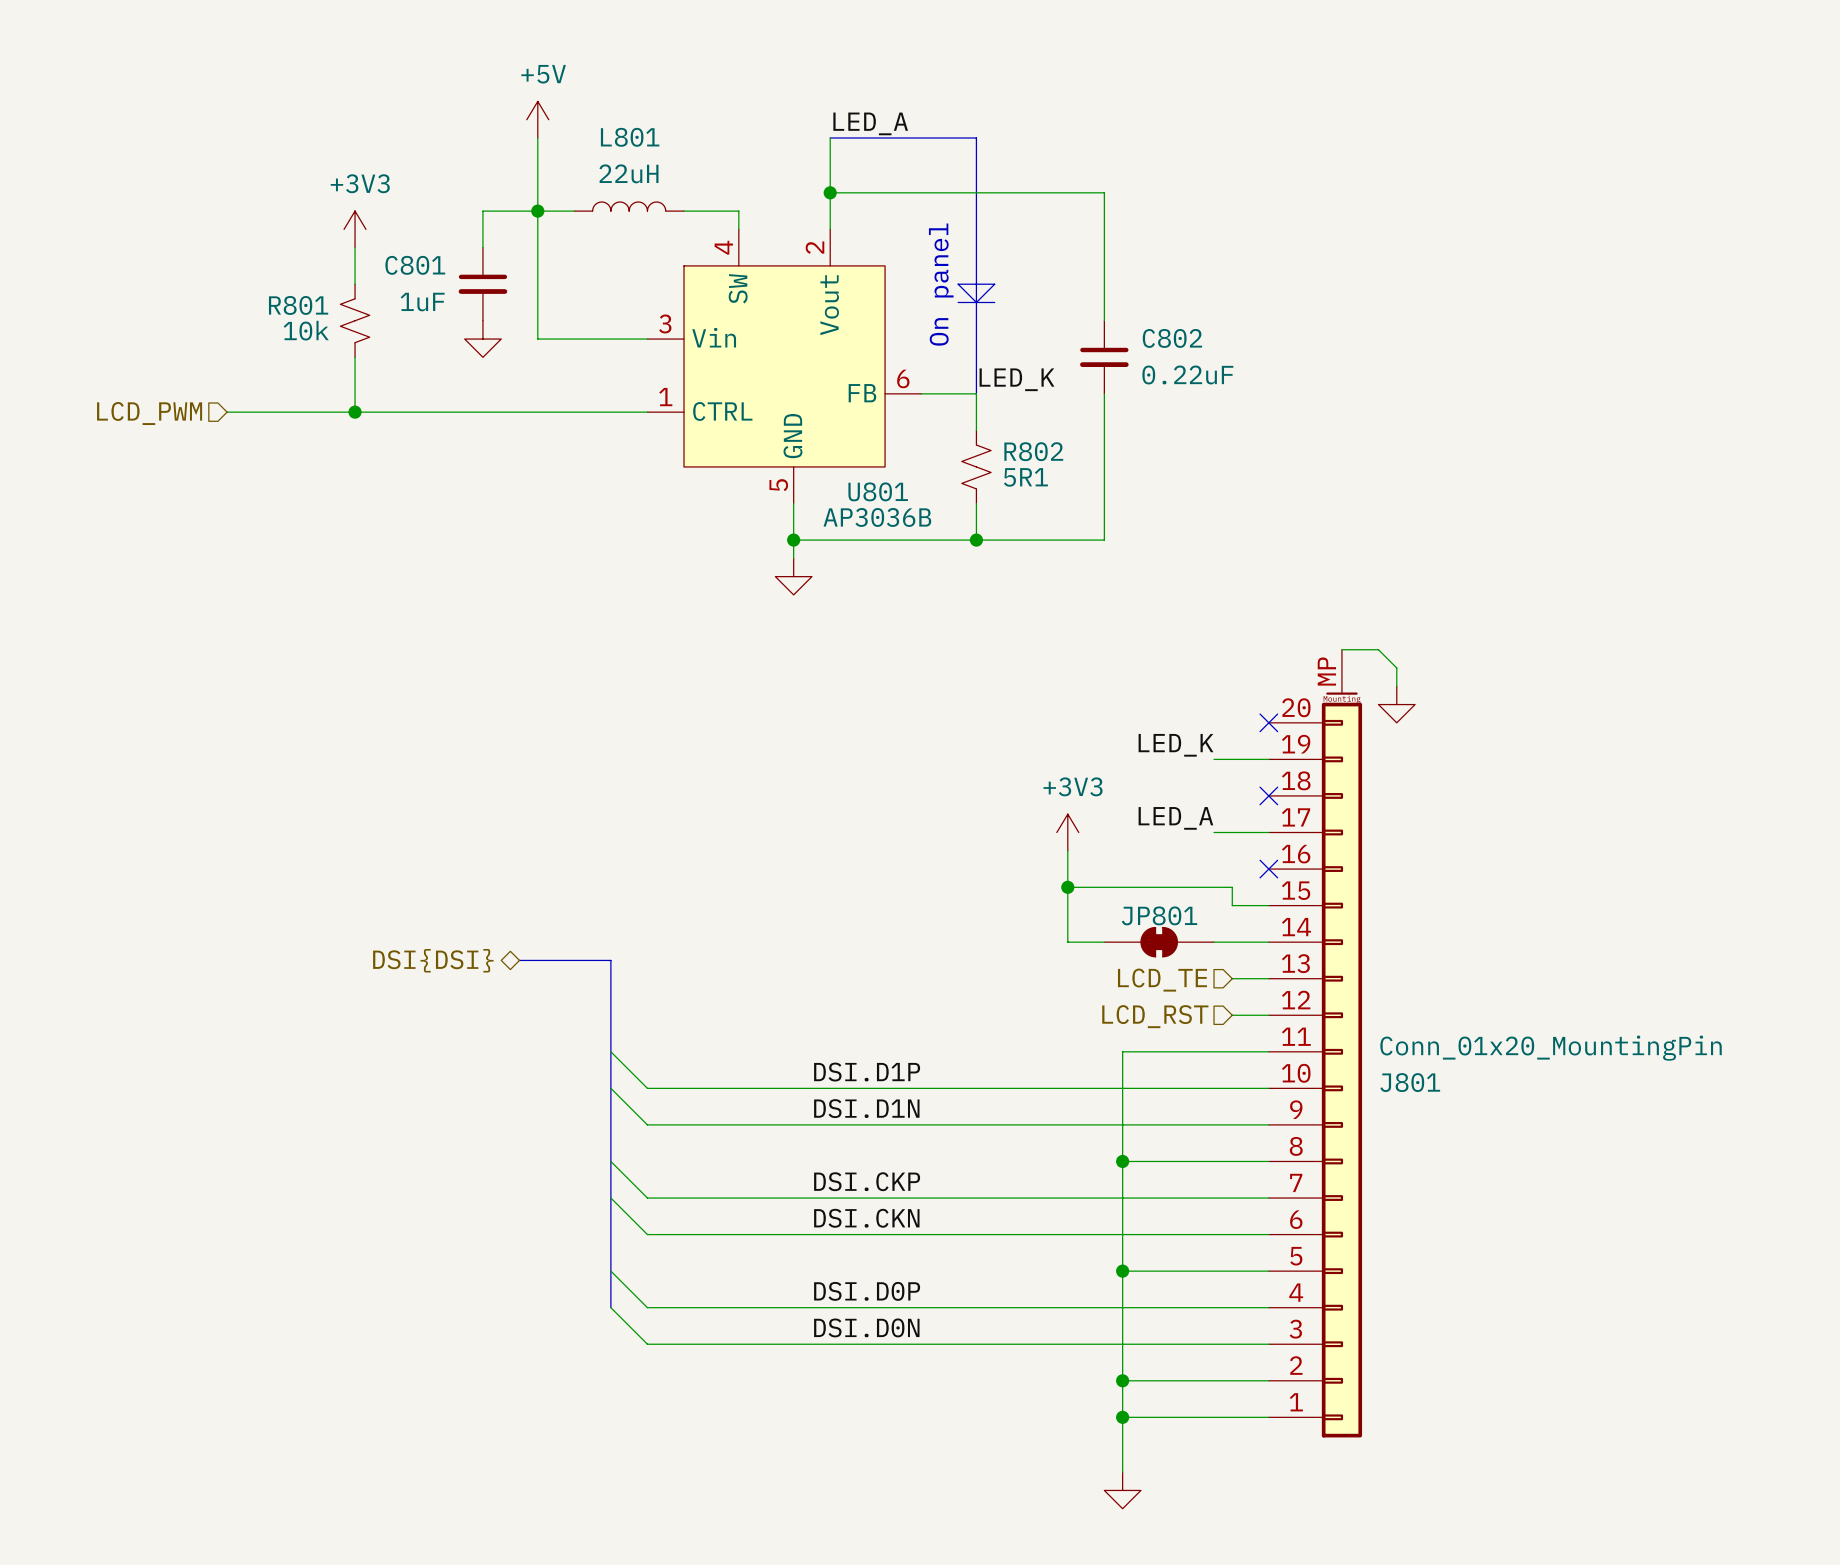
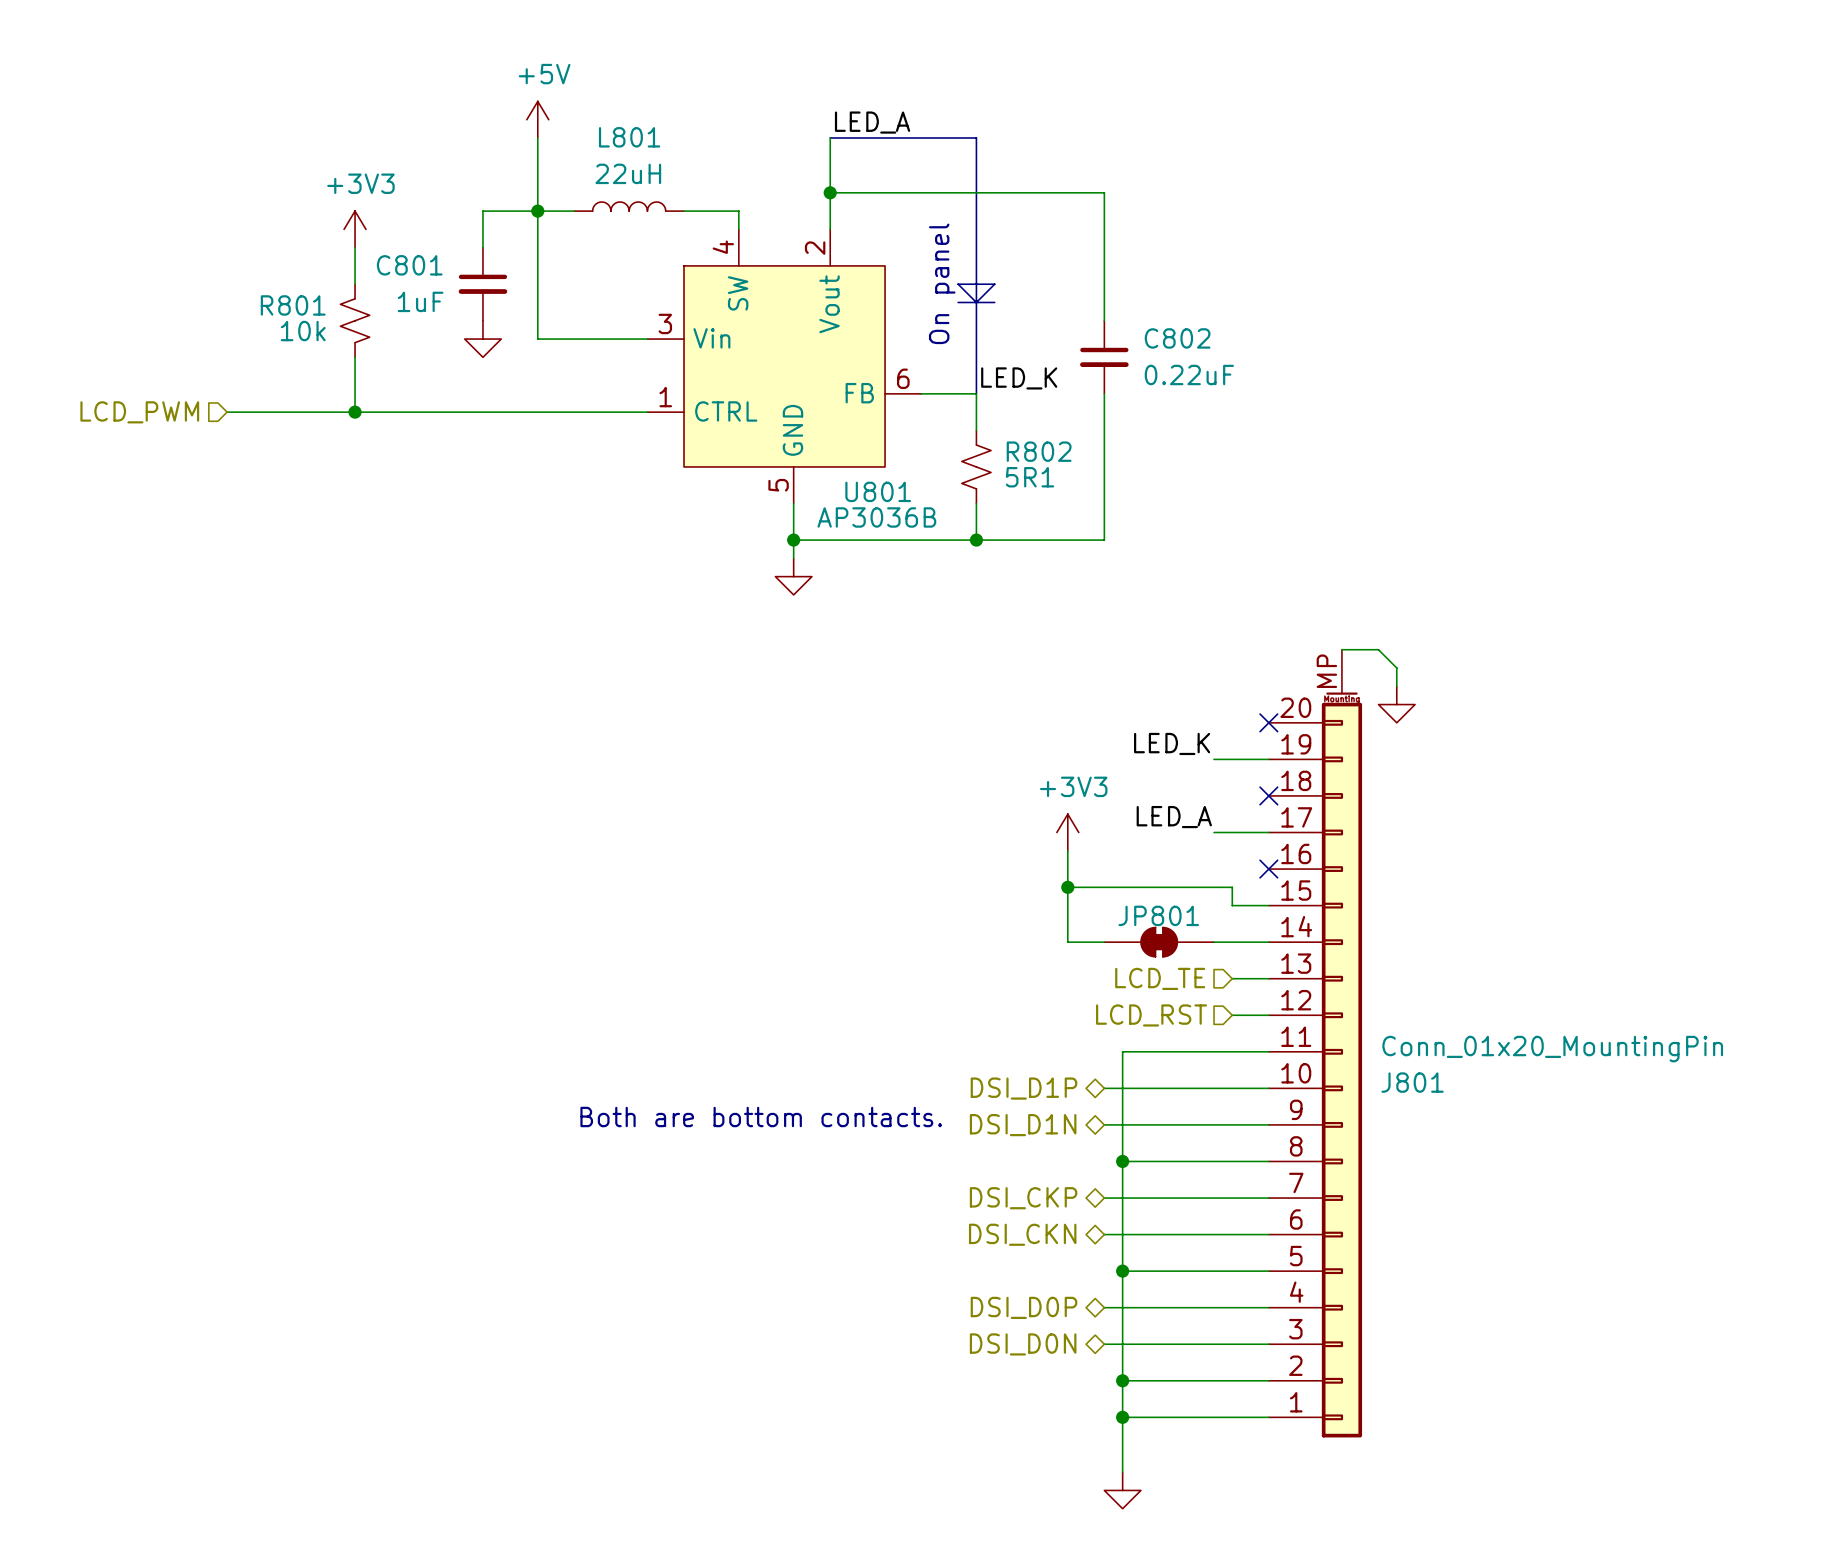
hierarchical label: DSI{DSI} (433, 960) -> none
bus: (519, 960) (610, 960) (610, 1307) -> none
wire: (610, 1051) (647, 1088) (1104, 1088) -> none
label: DSI.D1P (867, 1072) -> none
wire: (610, 1088) (647, 1124) (1104, 1124) -> none
hierarchical label: none -> DSI_D1P (1024, 1088)
label: DSI.D1N (866, 1108) -> none
text: none -> Both are bottom contacts. (761, 1116)
hierarchical label: none -> DSI_D1N (1023, 1125)
wire: (610, 1161) (647, 1198) (1104, 1198) -> none
label: DSI.CKP (867, 1181) -> none
wire: (610, 1198) (647, 1234) (1104, 1234) -> none
hierarchical label: none -> DSI_CKP (1023, 1198)
label: DSI.CKN (866, 1218) -> none
hierarchical label: none -> DSI_CKN (1022, 1234)
wire: (610, 1271) (647, 1307) (1104, 1307) -> none
label: DSI.D0P (867, 1291) -> none
wire: (610, 1307) (647, 1344) (1104, 1344) -> none
hierarchical label: none -> DSI_D0P (1024, 1307)
label: DSI.D0N (866, 1327) -> none
hierarchical label: none -> DSI_D0N (1023, 1344)

